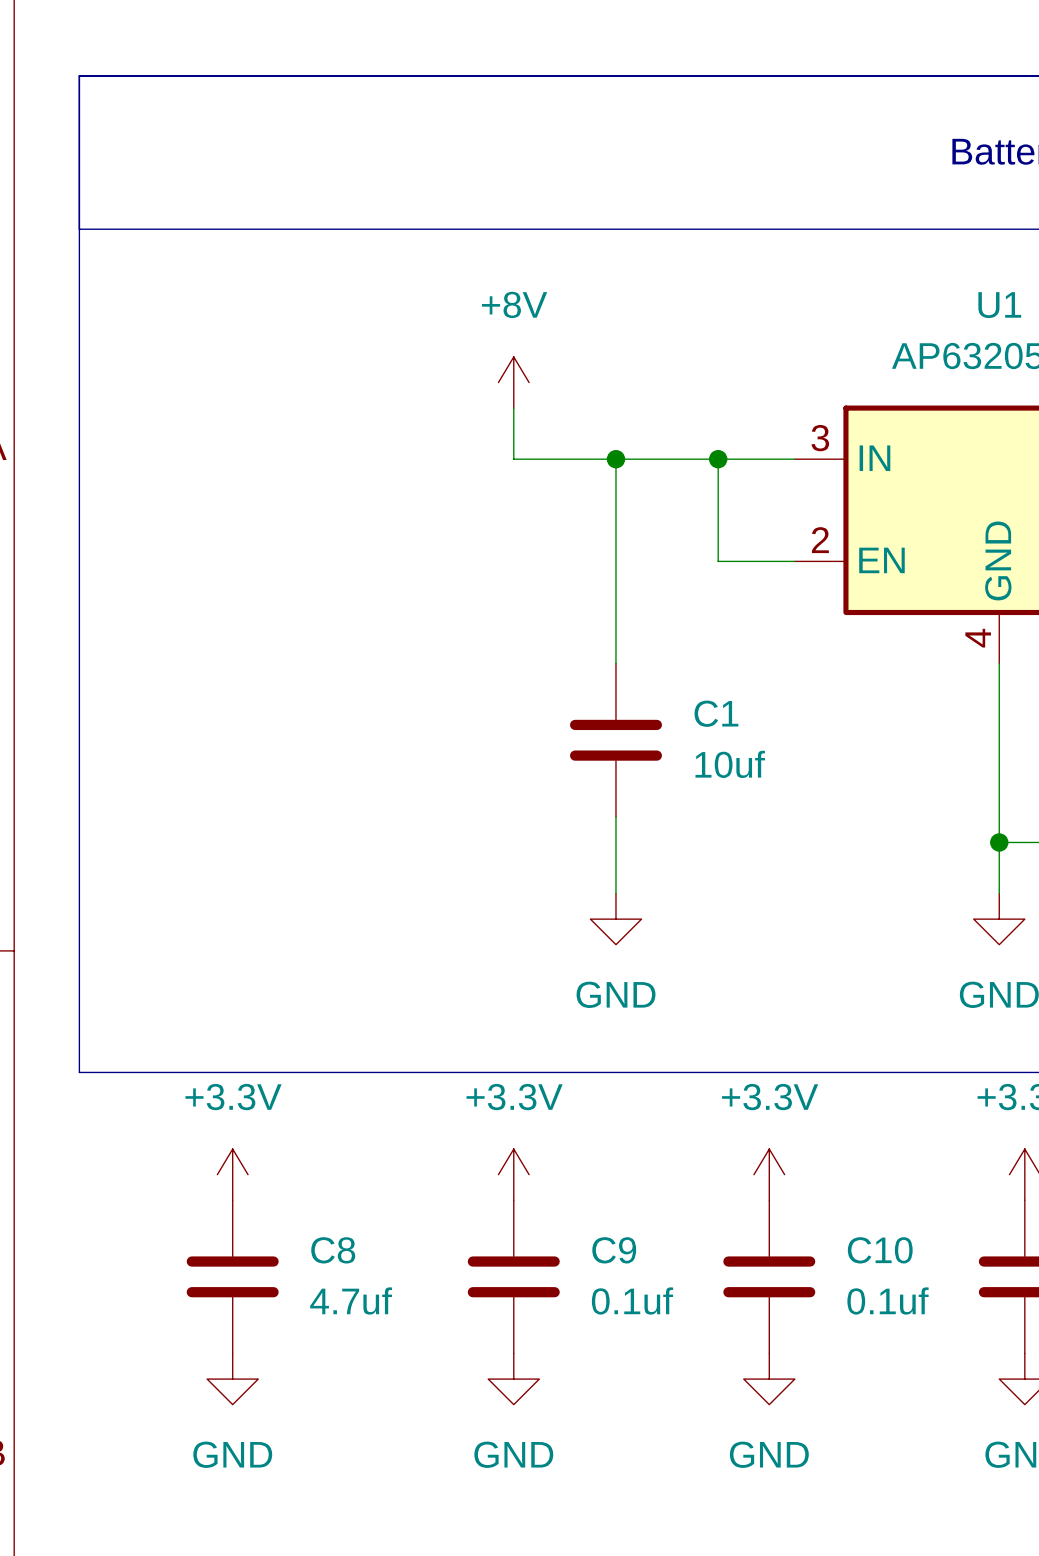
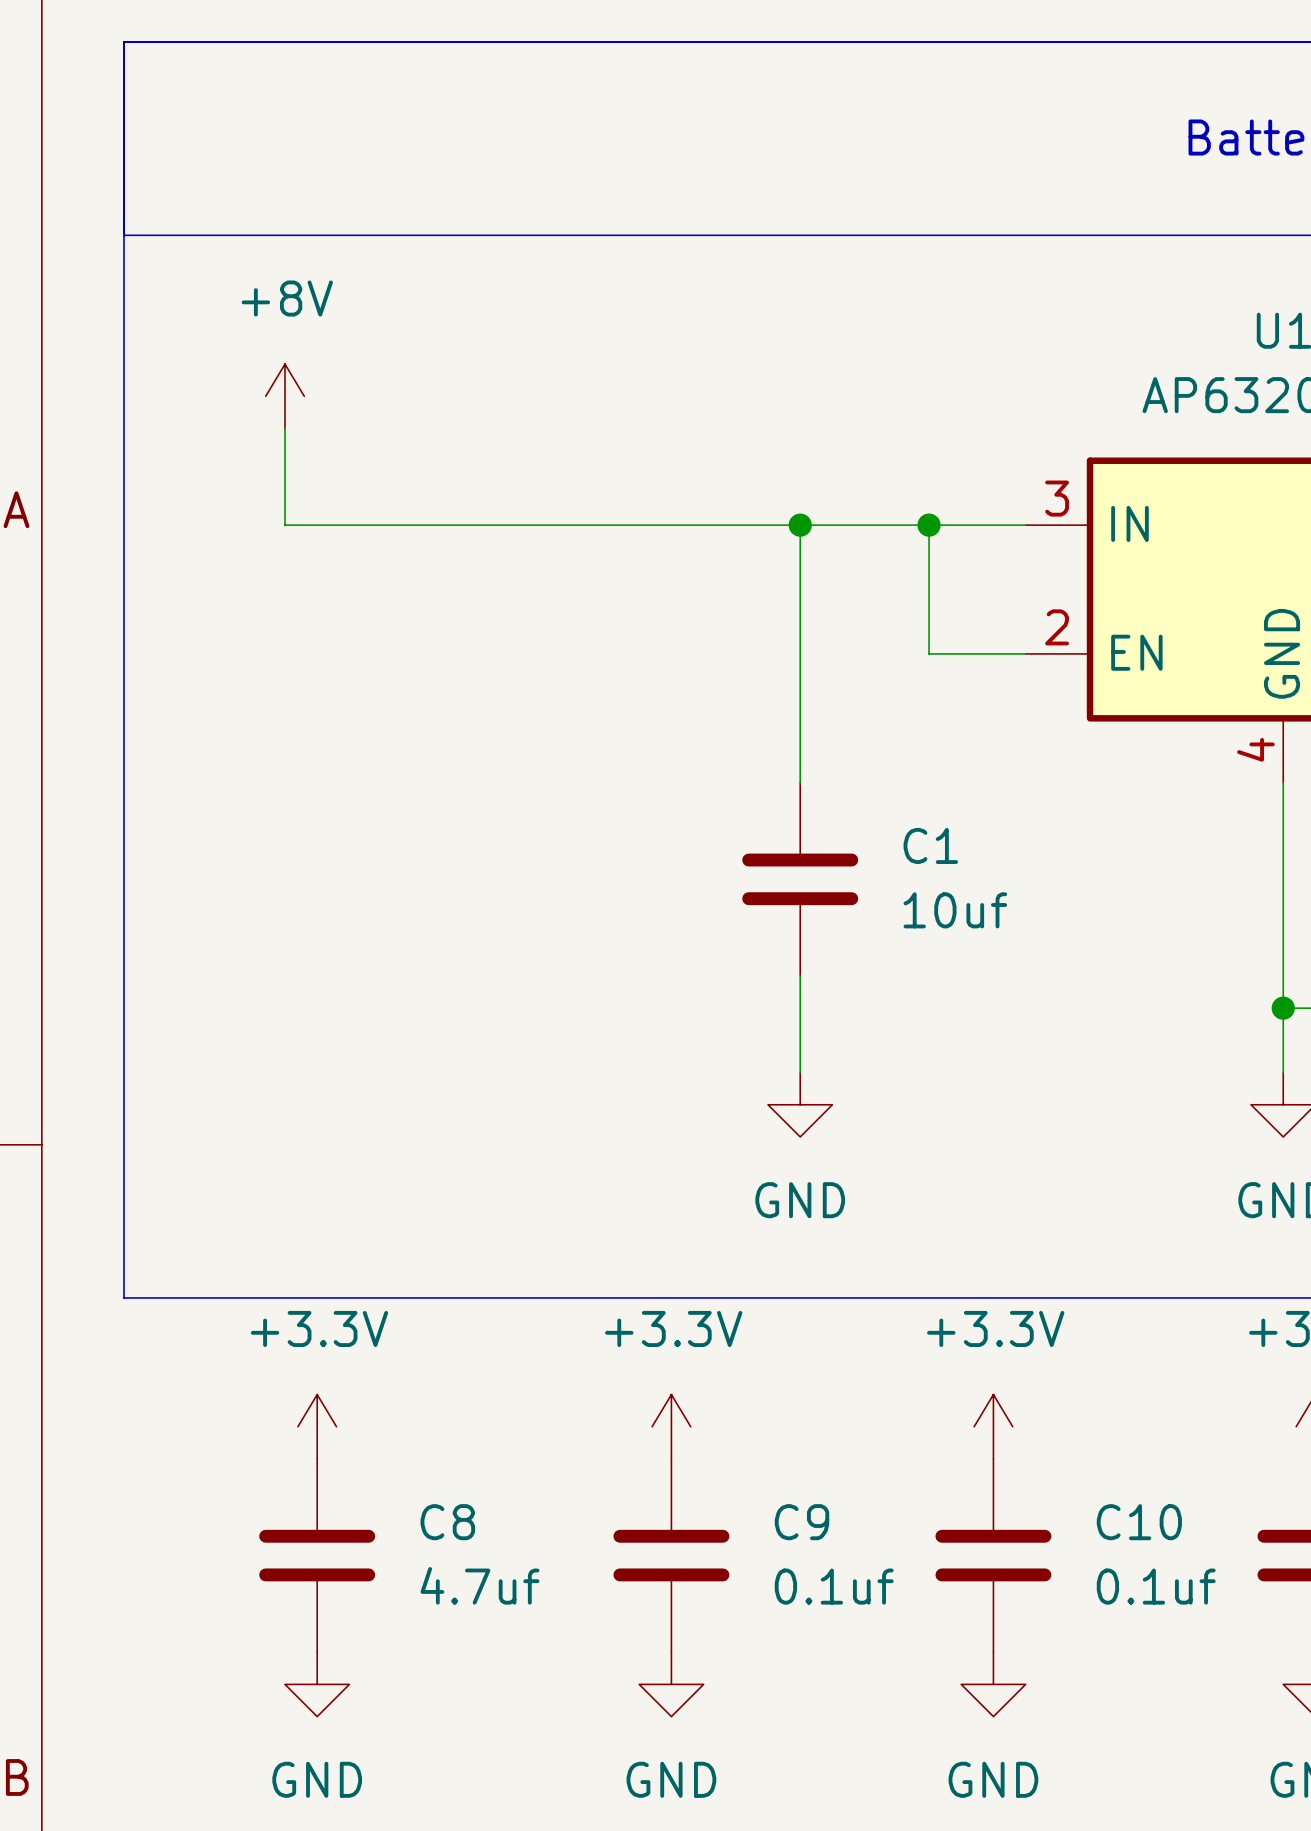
power symbol position: +8V (513, 382) -> +8V (284, 396)
wire: (513, 408) (513, 459) -> (284, 428) (284, 525) (671, 525)

